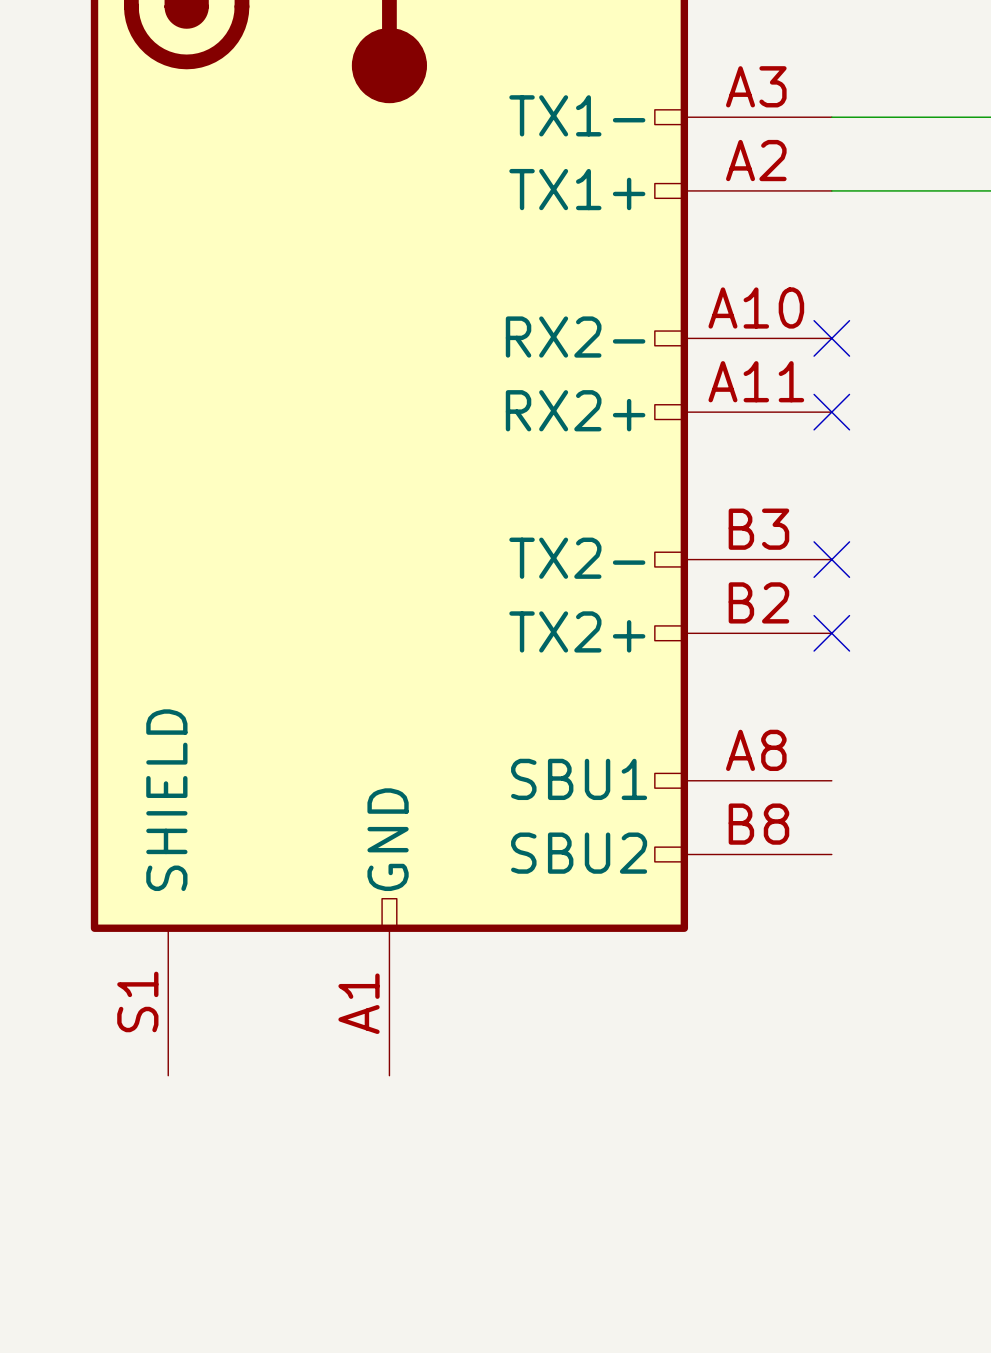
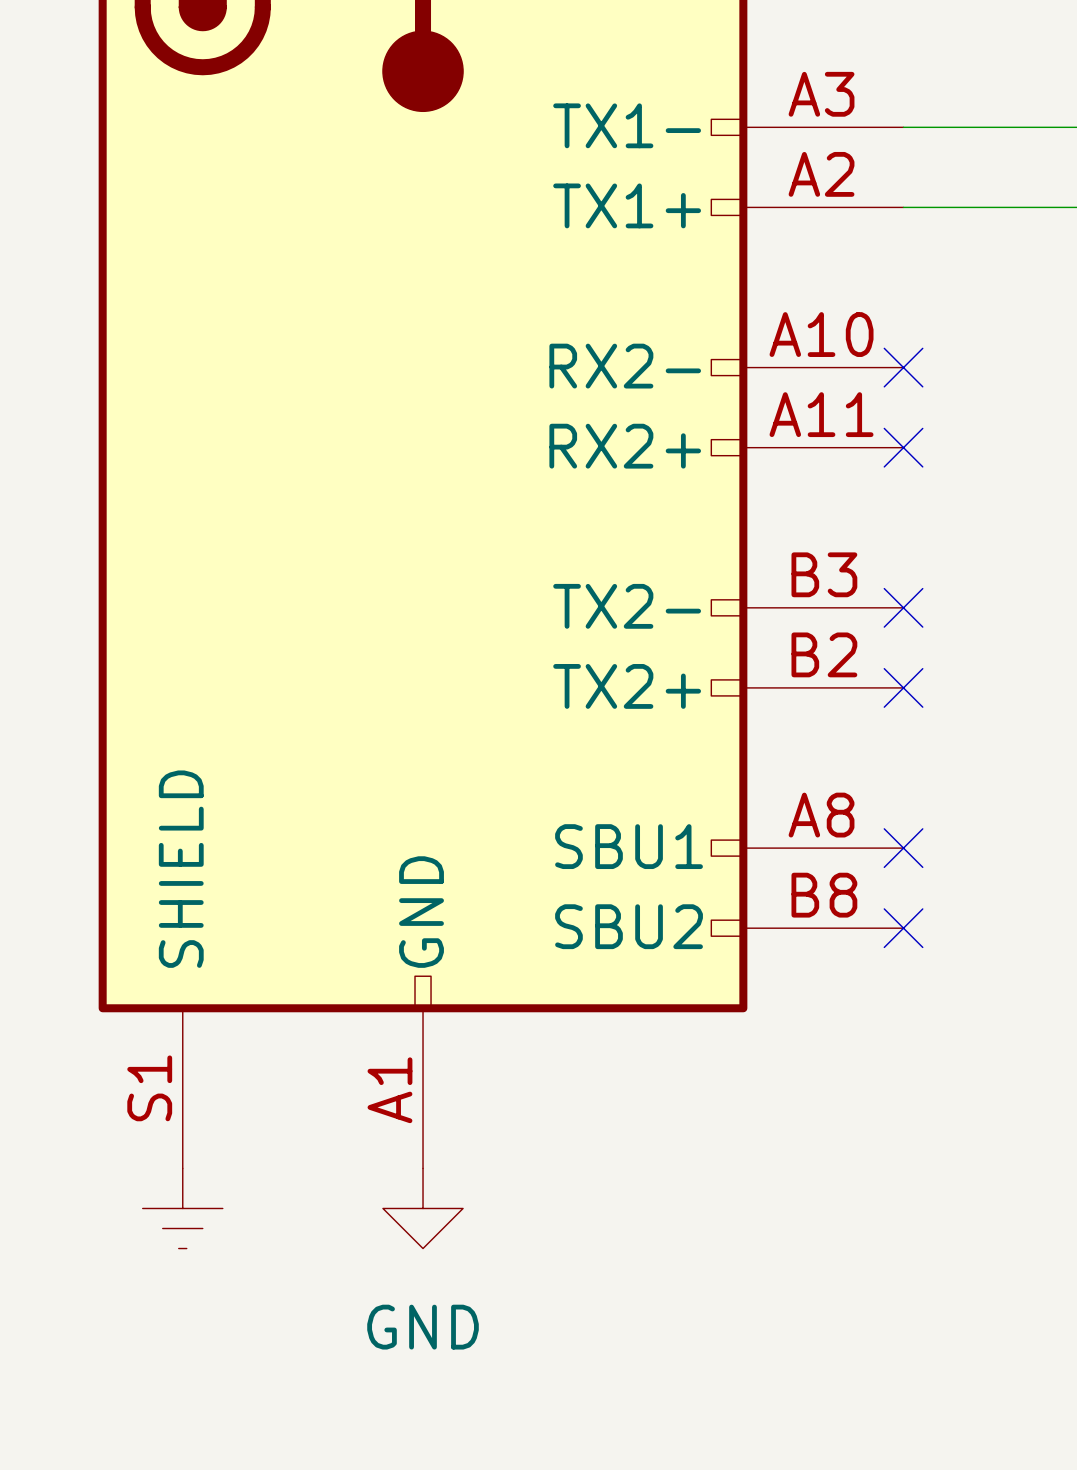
no-connect mark: none -> (903, 848)
no-connect mark: none -> (903, 928)
power symbol: none -> (182, 1208)
power symbol: none -> GND (423, 1208)

